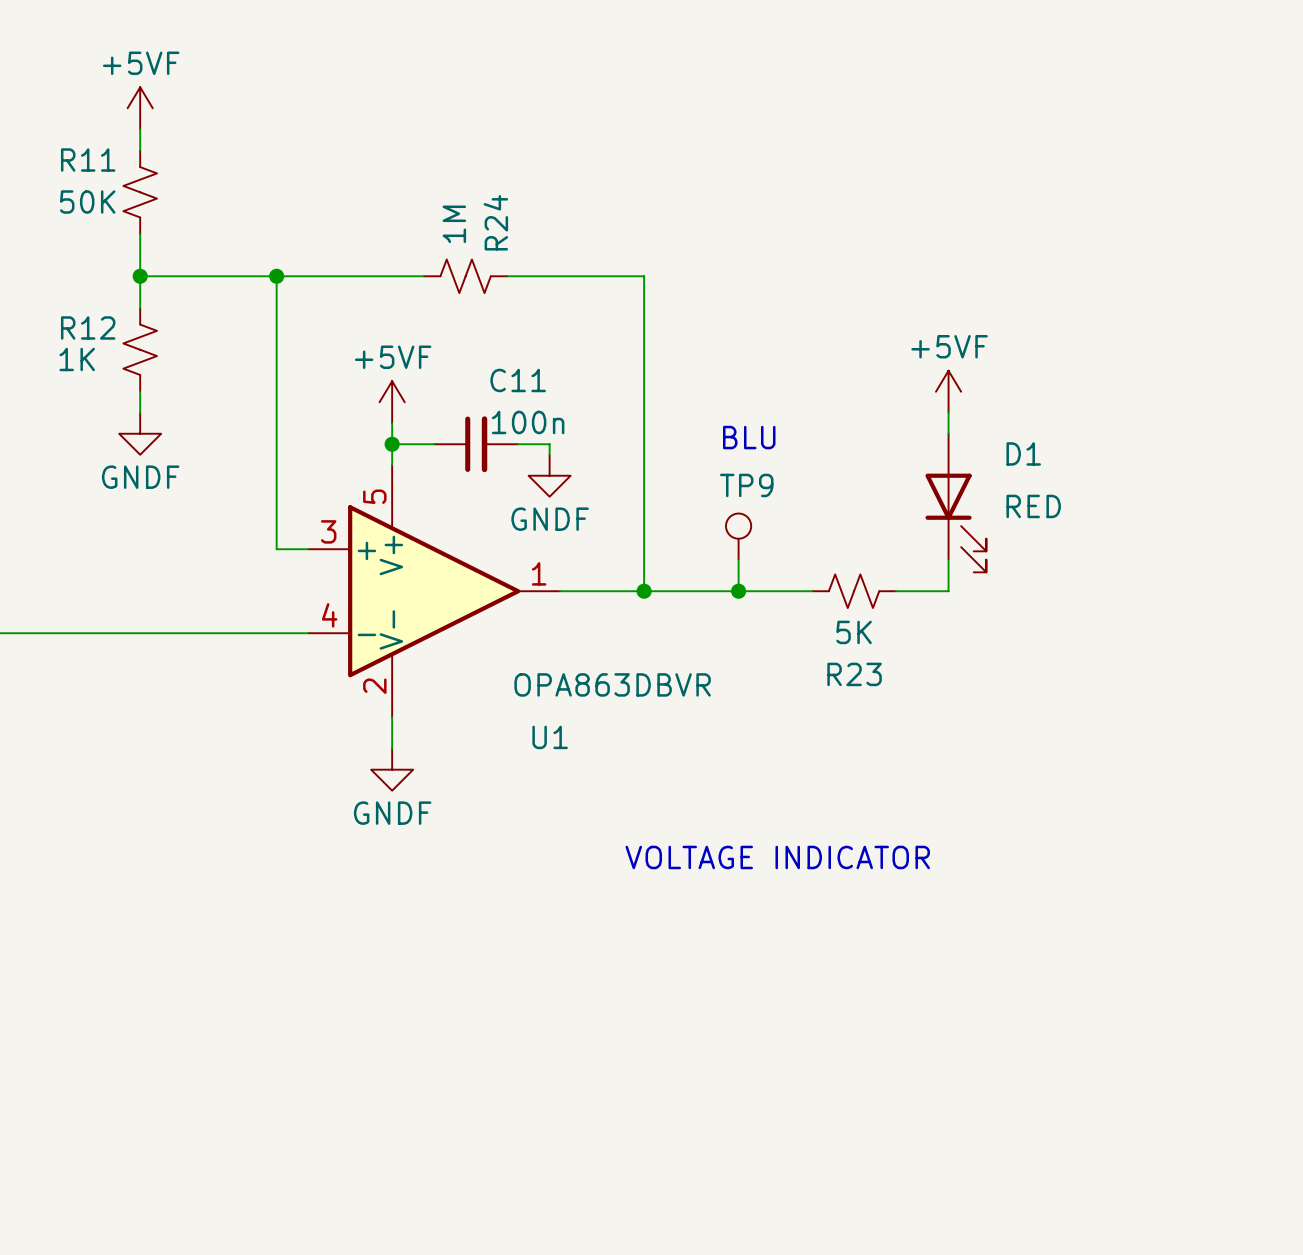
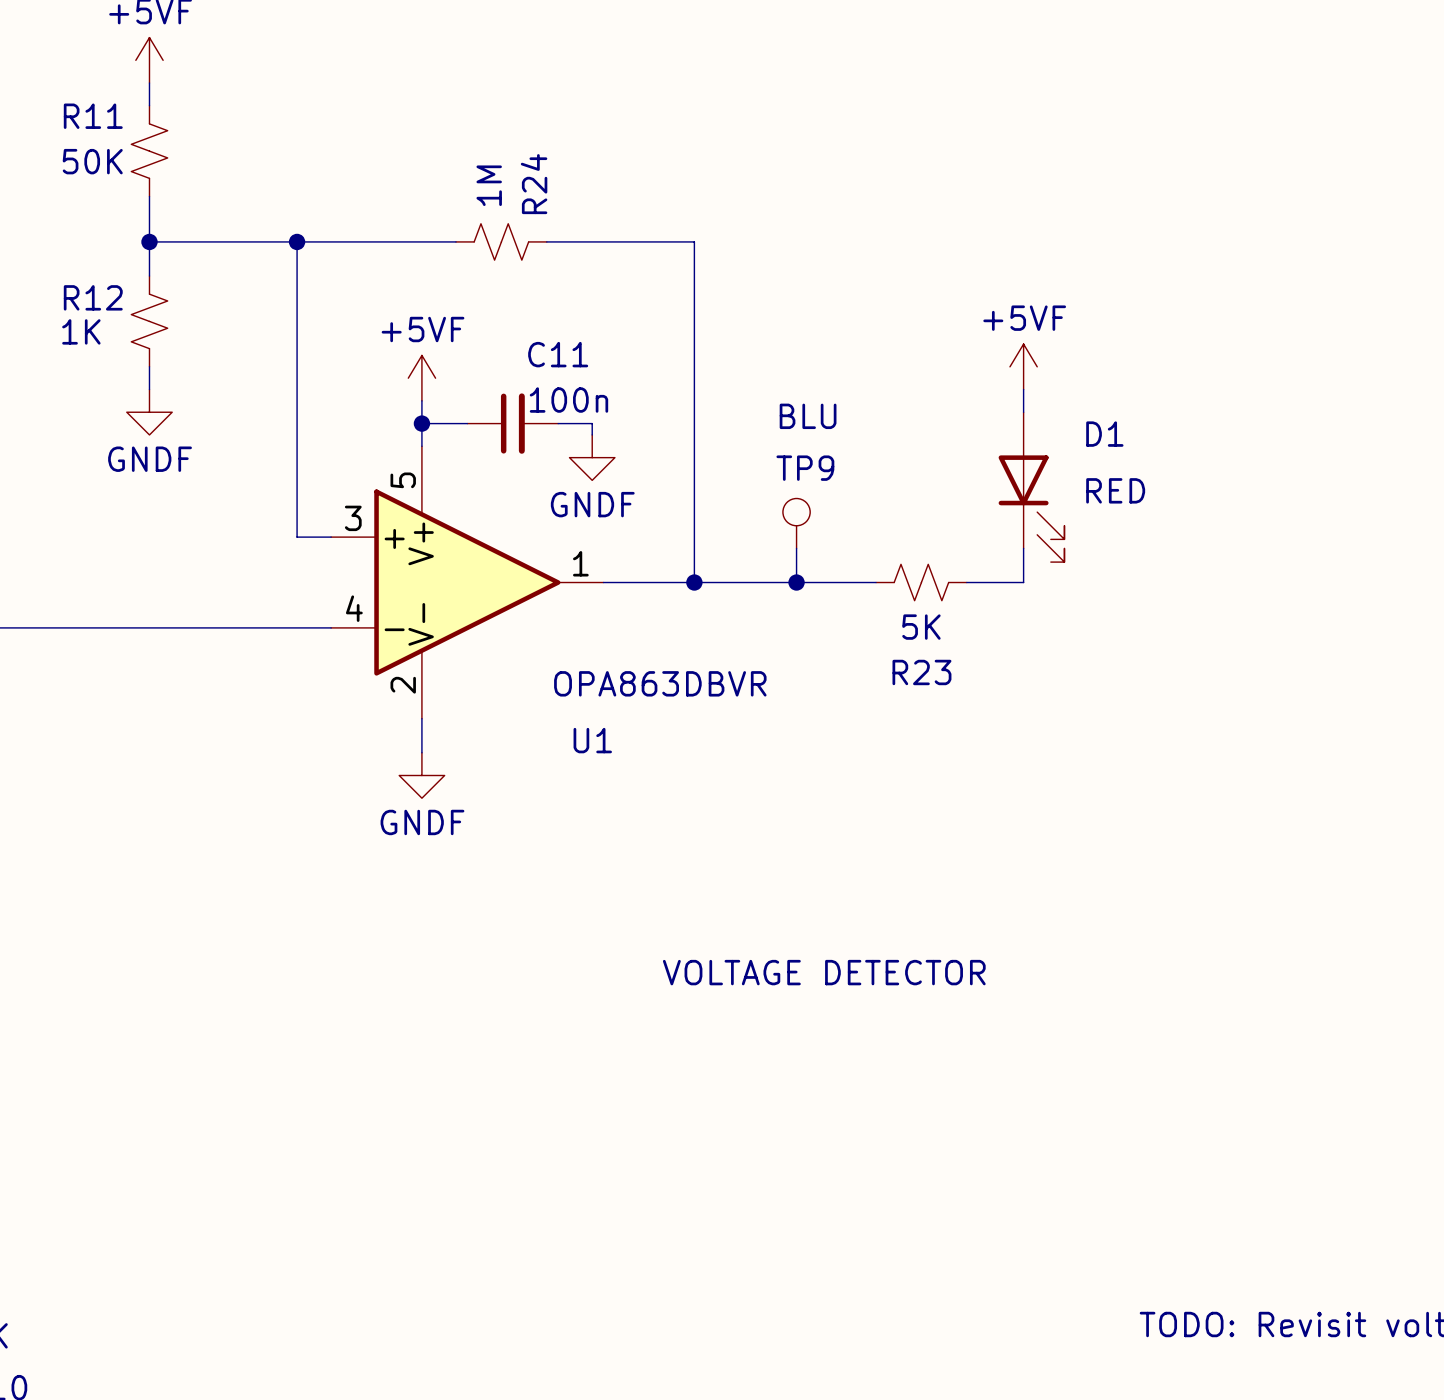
text: VOLTAGE INDICATOR (777, 857) -> none
text: none -> VOLTAGE DETECTOR (824, 972)

